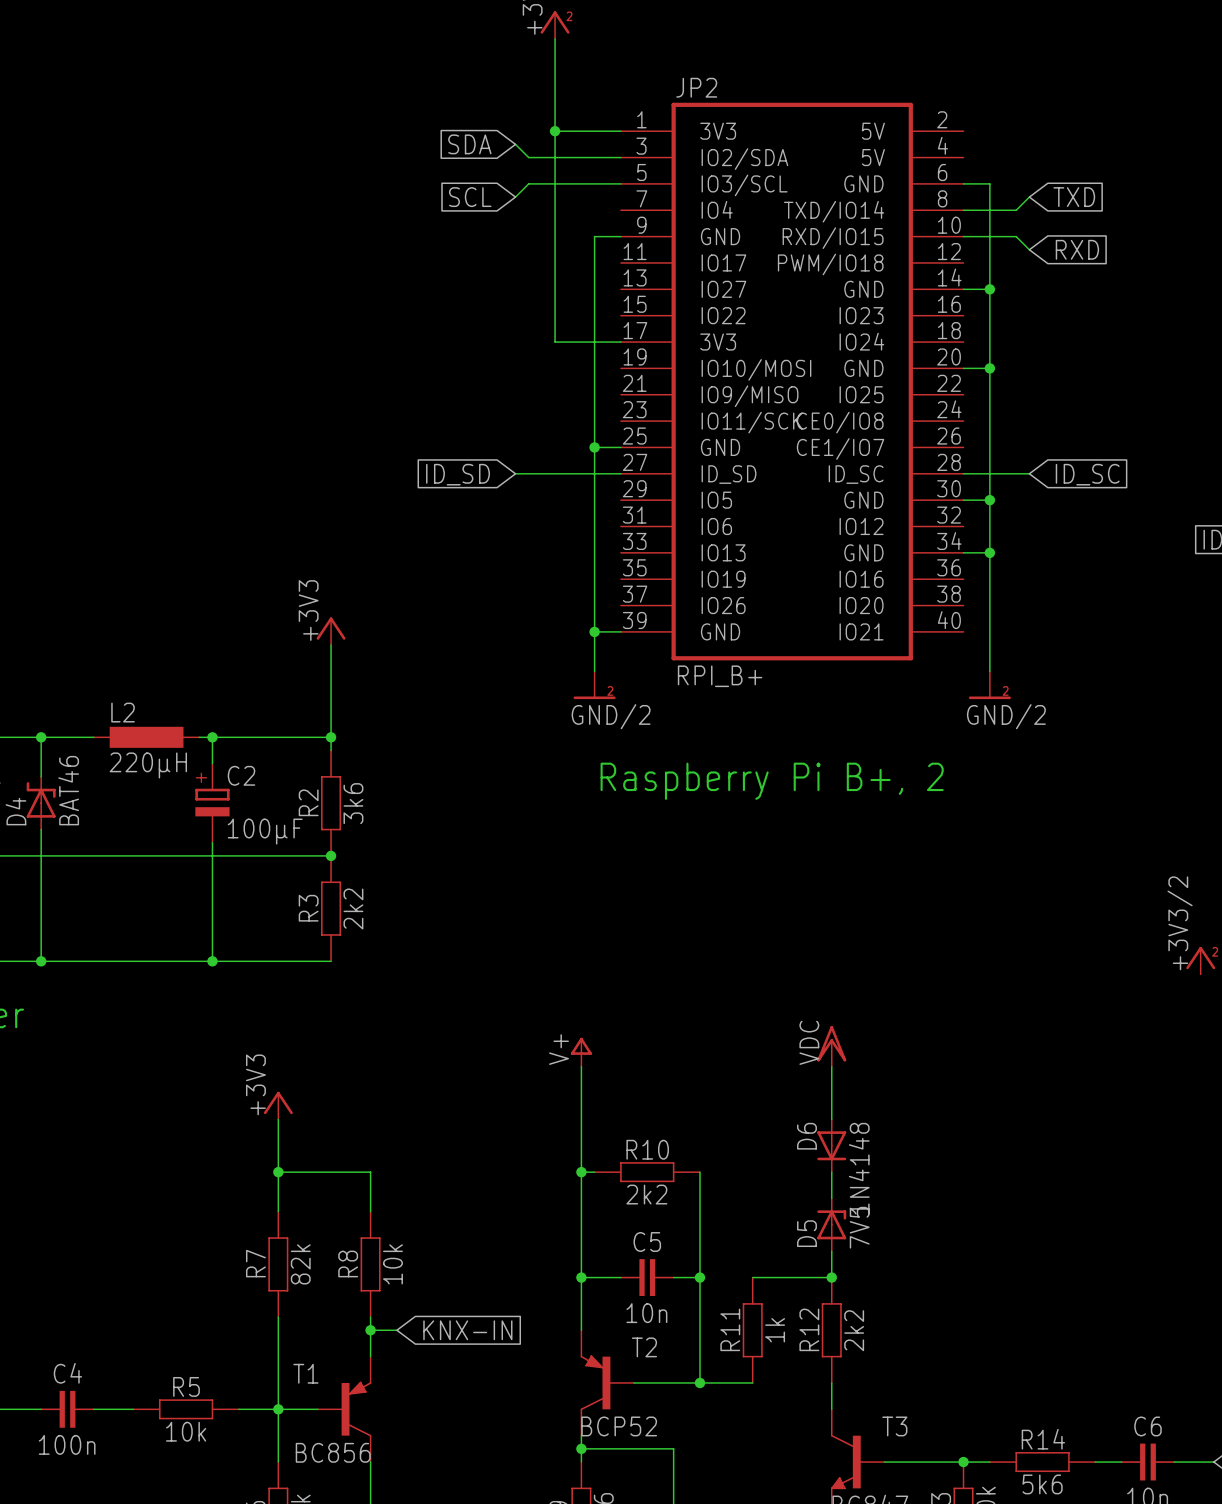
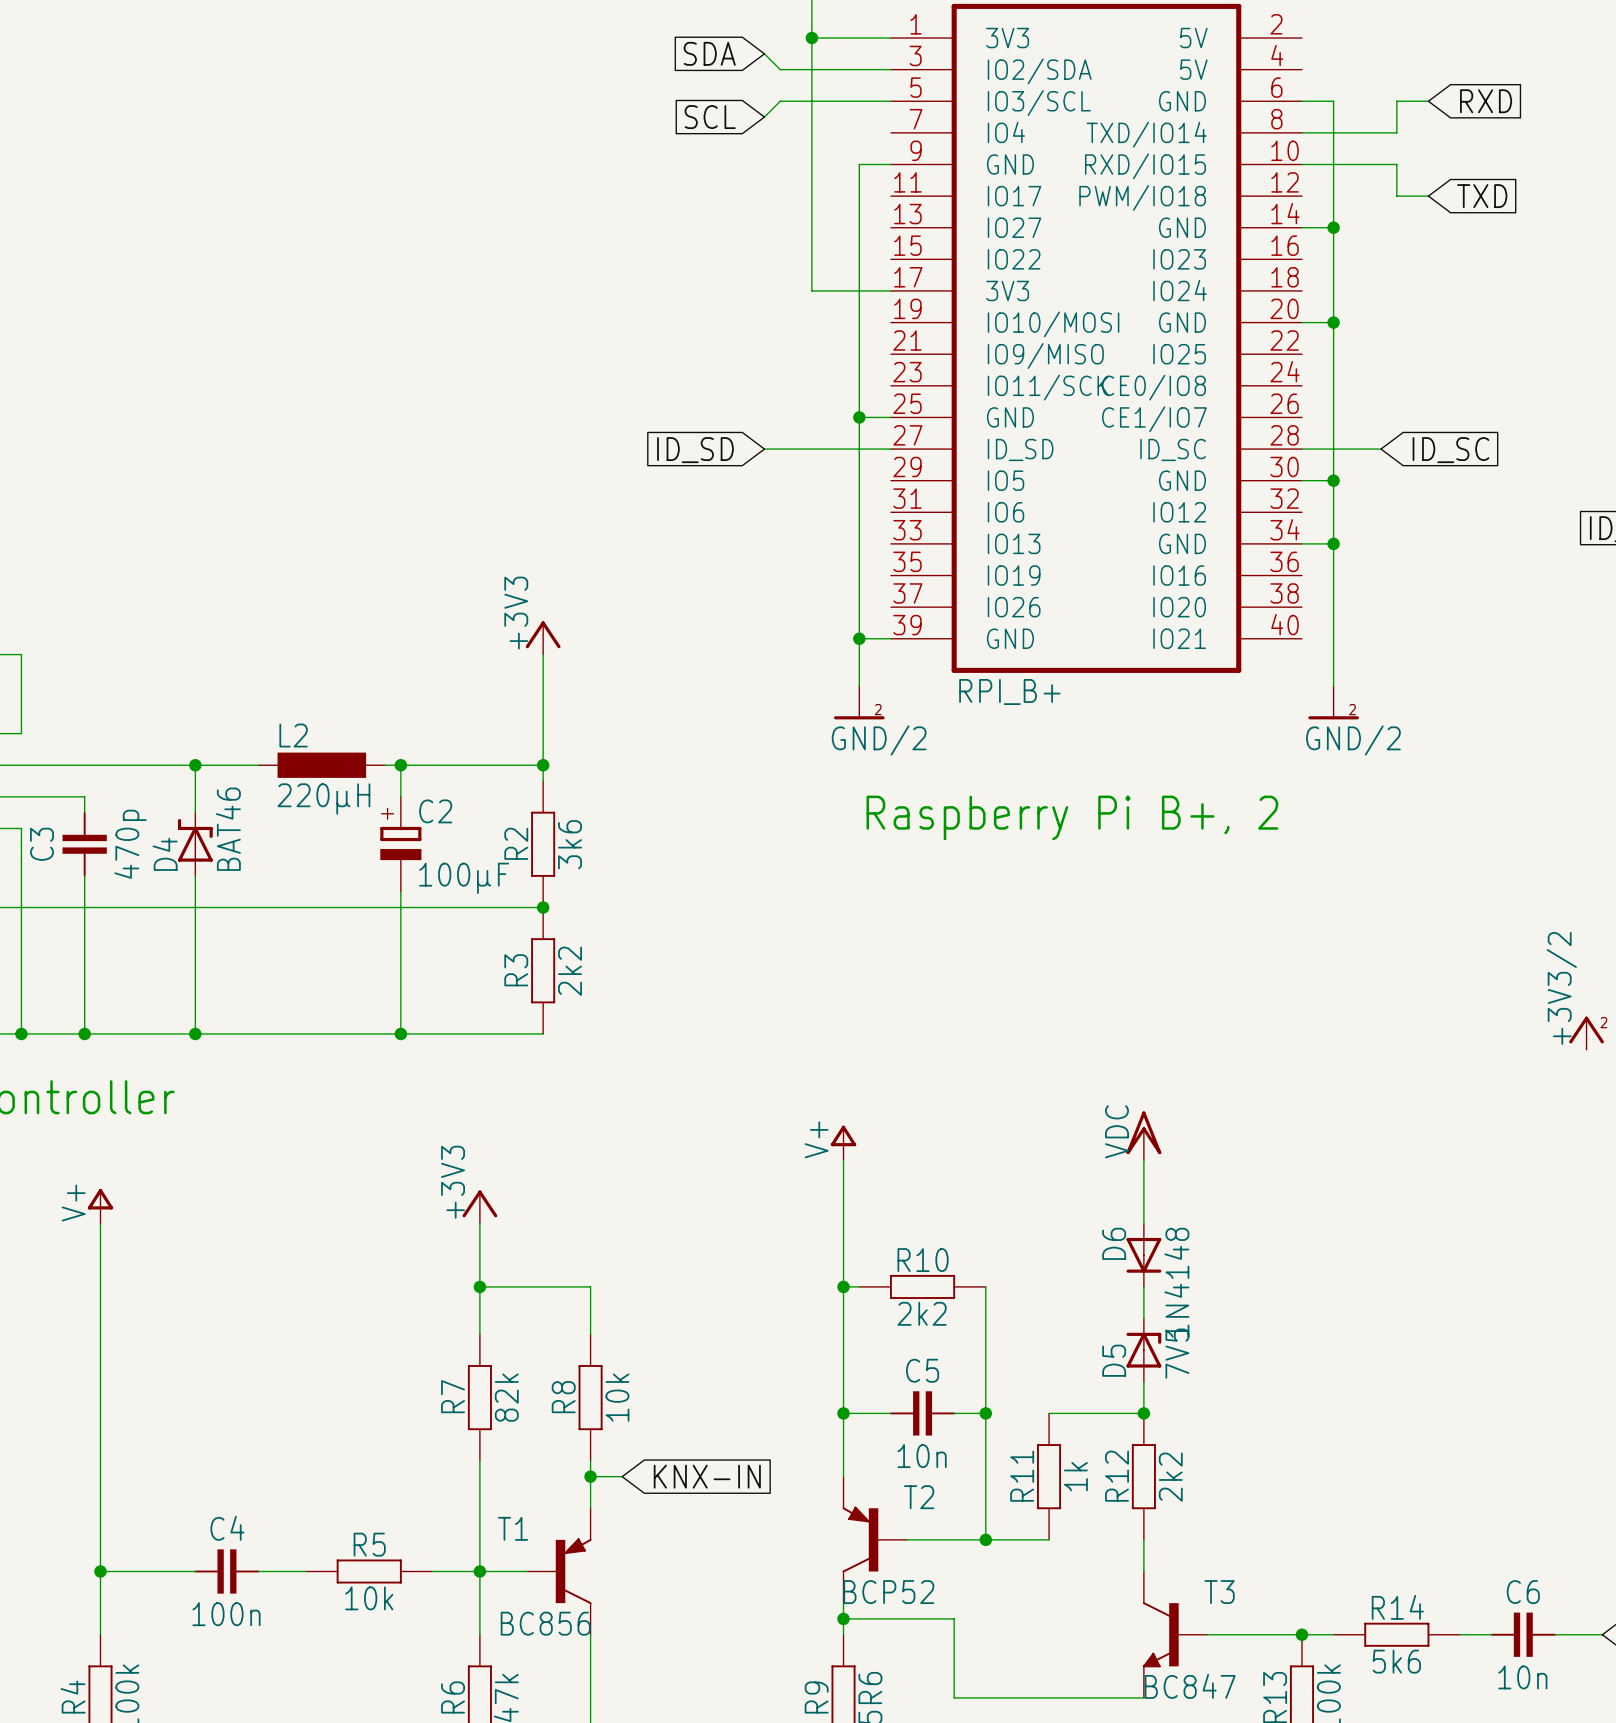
wire: (1029, 197) (1016, 210) -> (1428, 101) (1396, 101) (1396, 132) (1365, 132)
global label position: TXD (1074, 197) -> TXD (1482, 196)
wire: (1016, 236) (1029, 249) -> (1365, 164) (1396, 164) (1396, 196) (1428, 196)
global label position: RXD (1077, 249) -> RXD (1486, 101)

